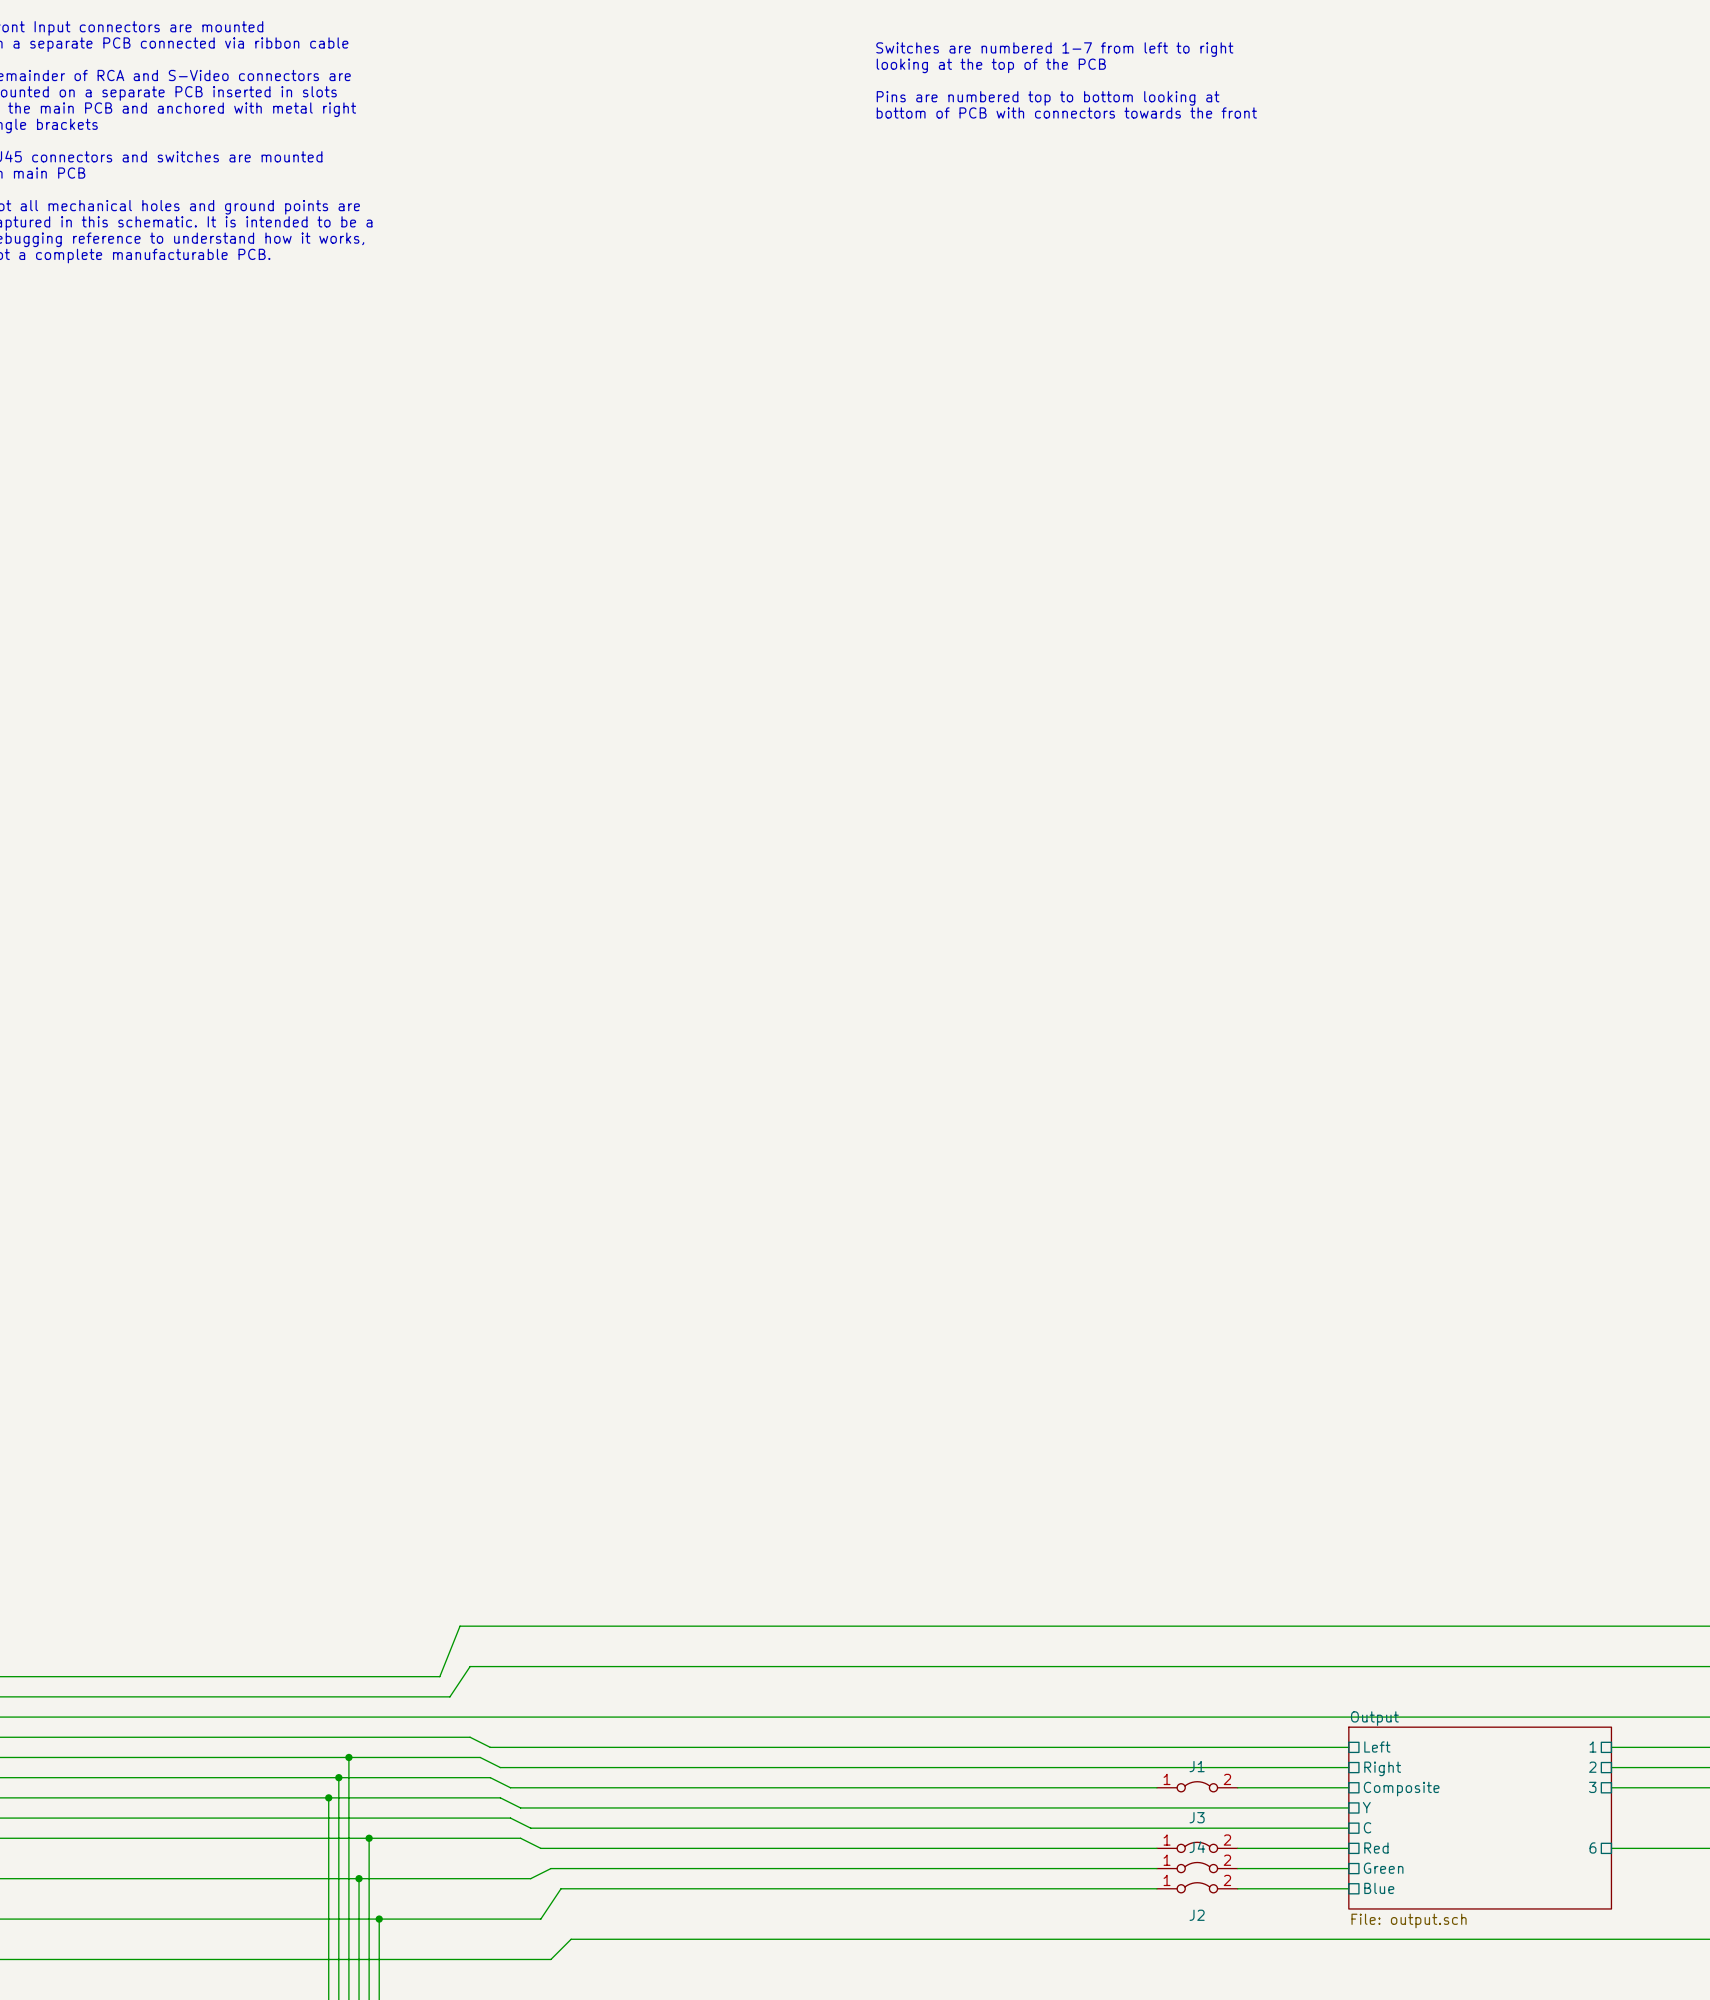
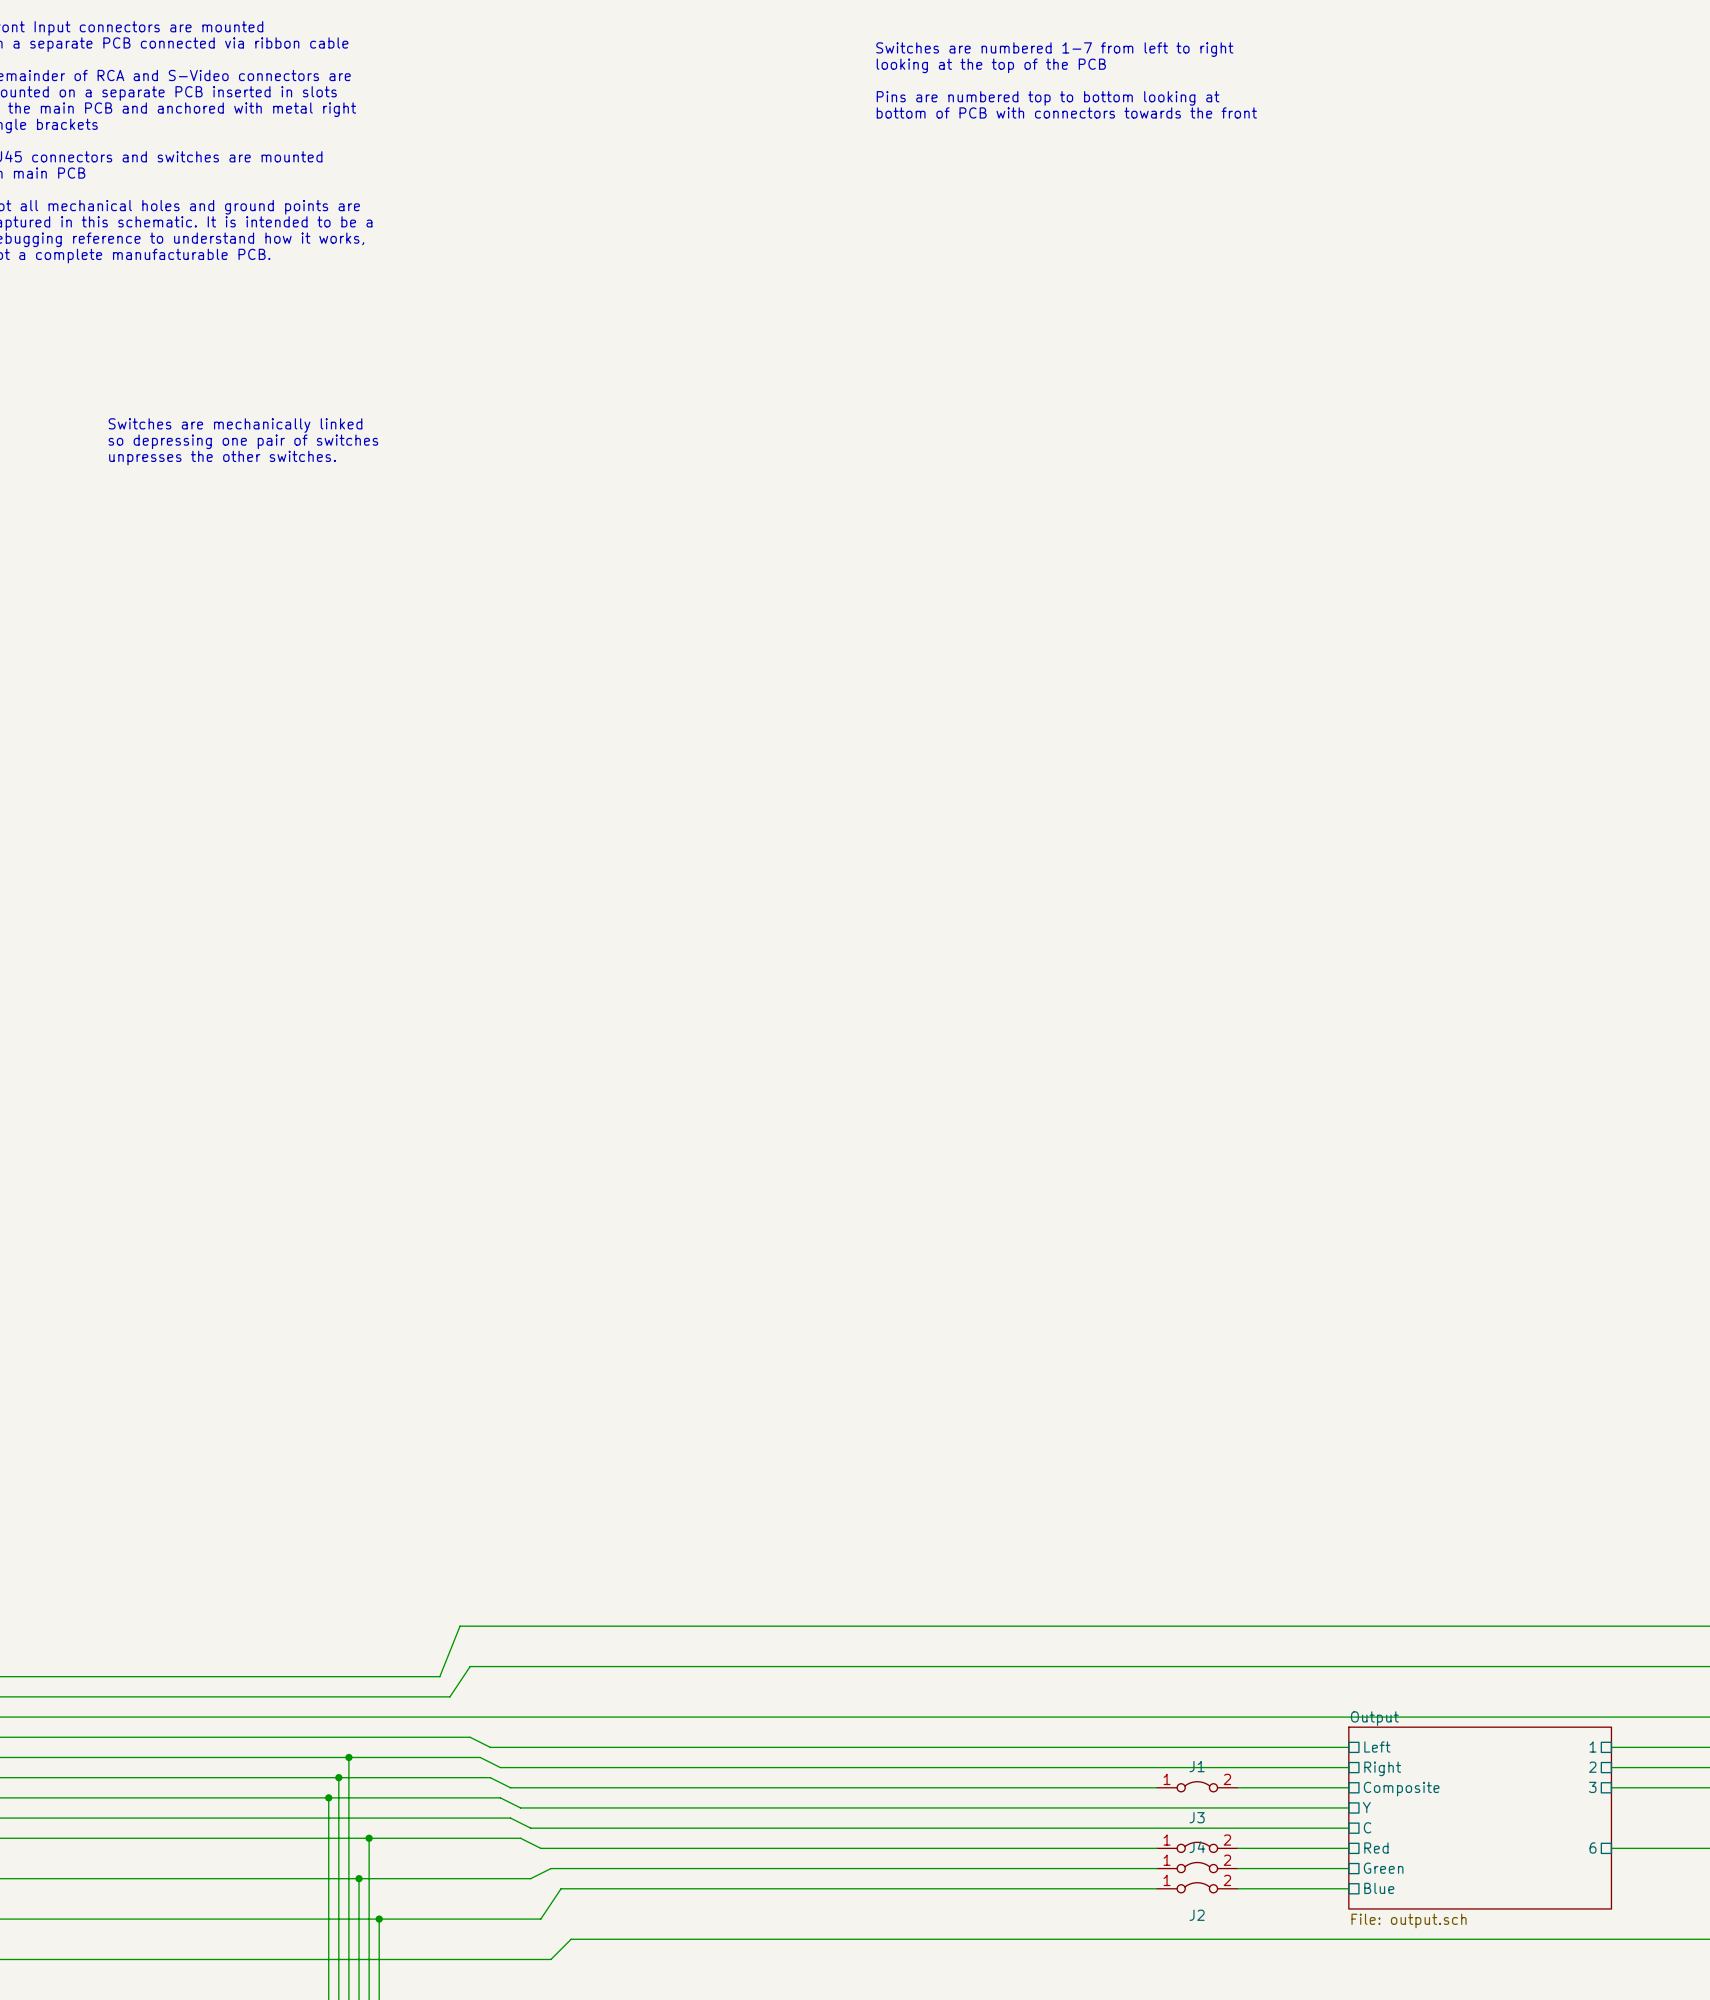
text: none -> Switches are mechanically linked (235, 425)
text: none -> so depressing one pair of switches (243, 441)
text: none -> unpresses the other switches. (222, 458)

